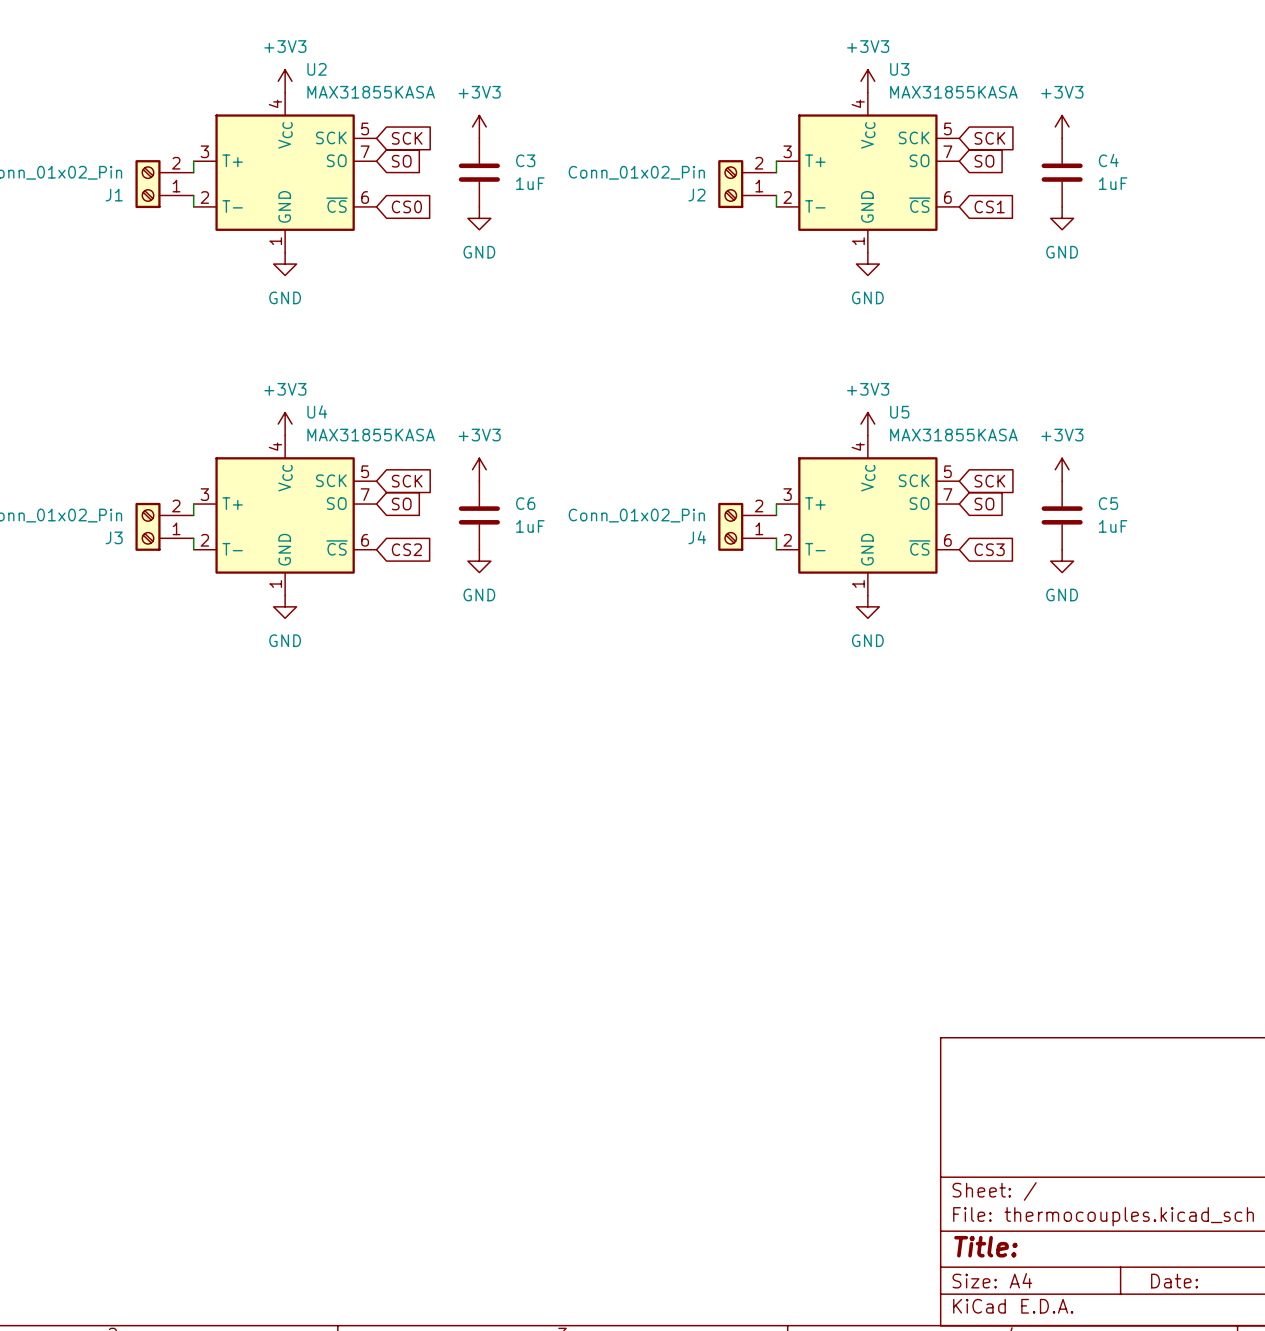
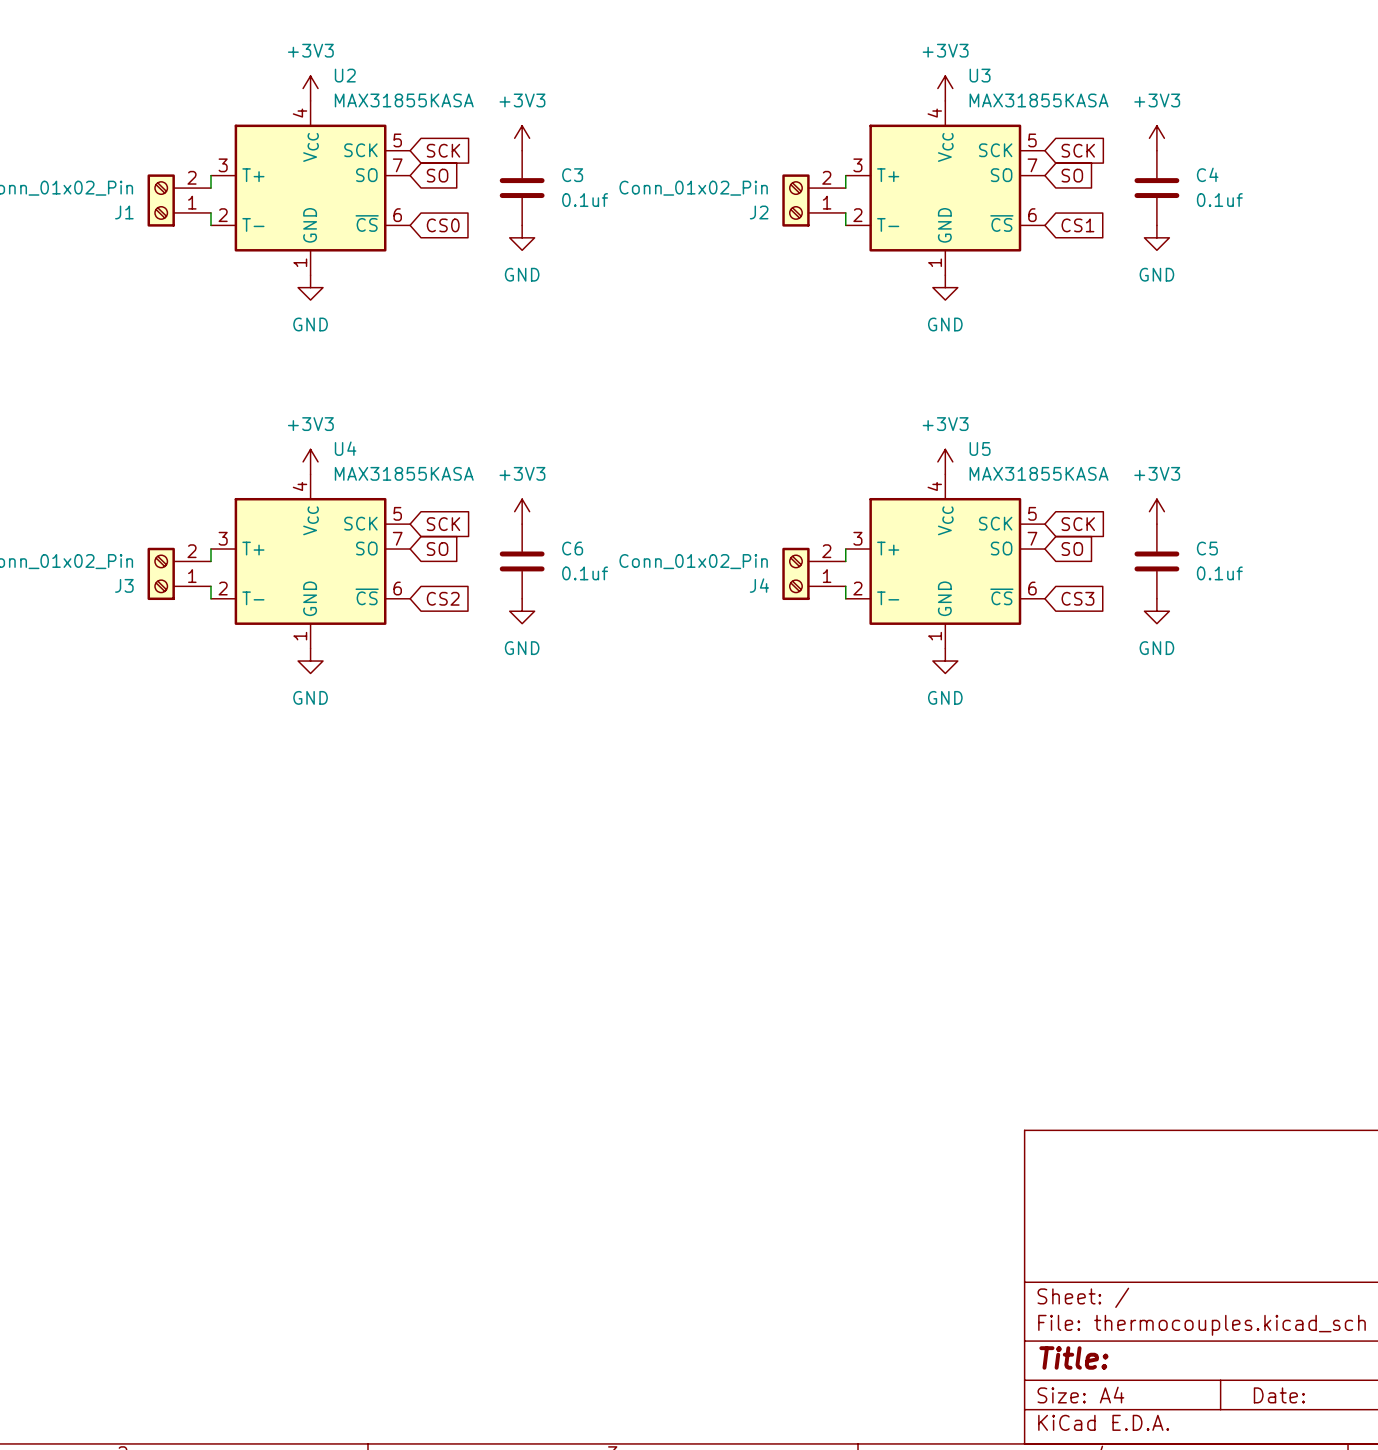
C3 value: 1uF (530, 183) -> 0.1uf (585, 200)
C4 value: 1uF (1113, 183) -> 0.1uf (1219, 200)
C6 value: 1uF (530, 526) -> 0.1uf (585, 573)
C5 value: 1uF (1113, 526) -> 0.1uf (1219, 573)

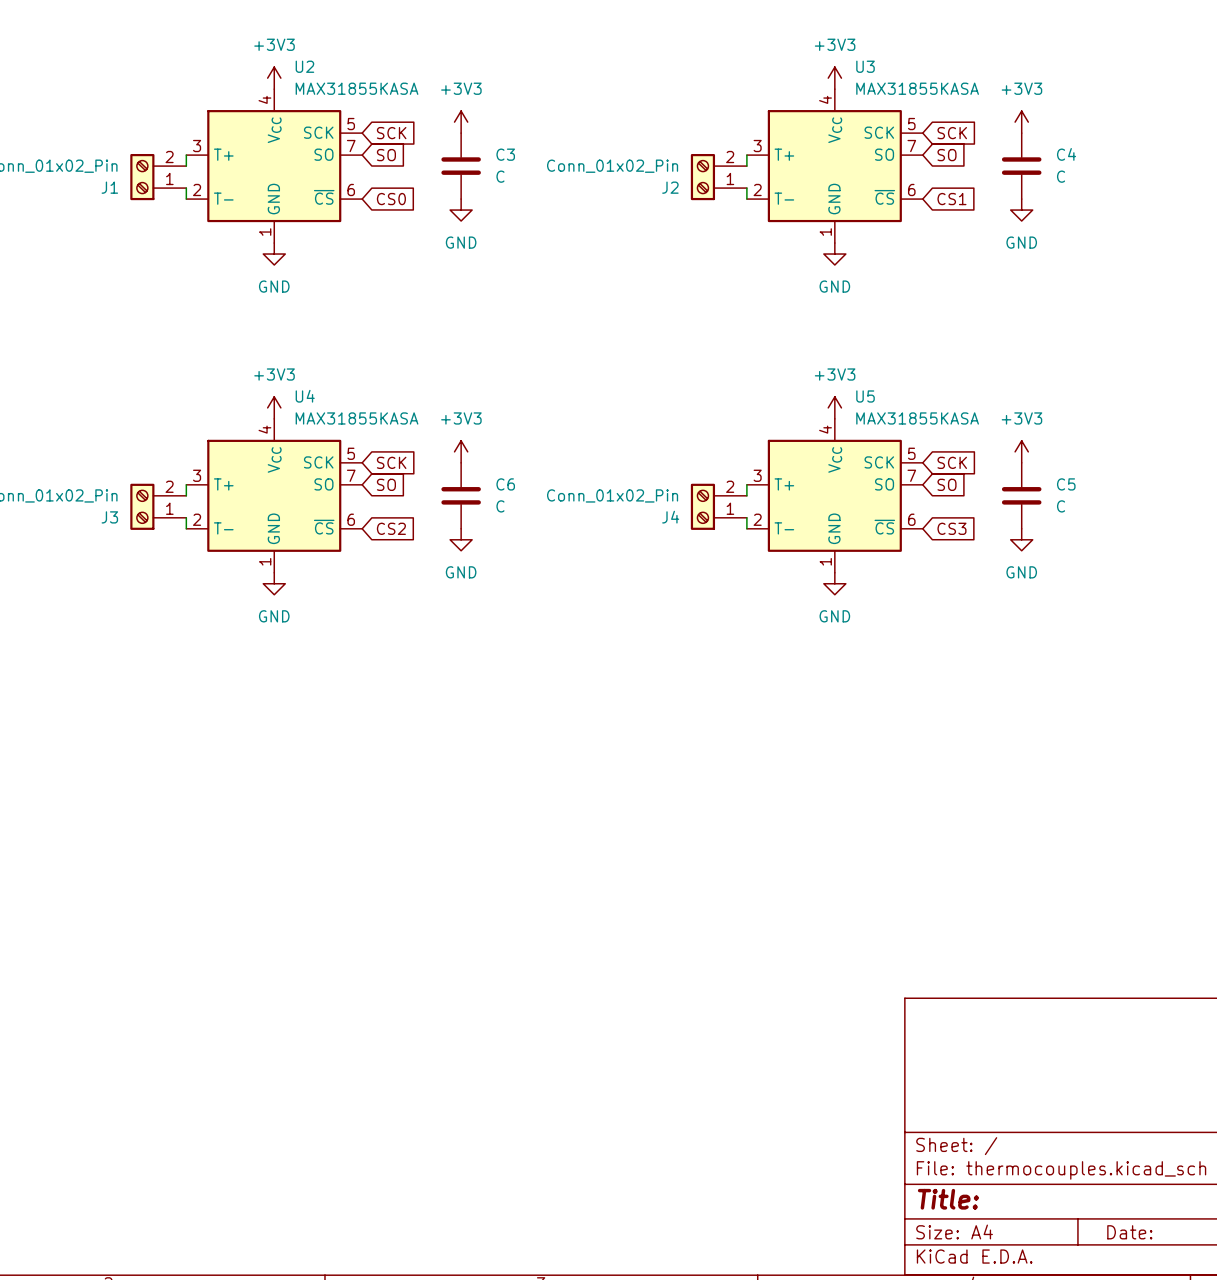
C3 value: 0.1uf (585, 200) -> C (500, 176)
C4 value: 0.1uf (1219, 200) -> C (1061, 176)
C6 value: 0.1uf (585, 573) -> C (500, 506)
C5 value: 0.1uf (1219, 573) -> C (1061, 506)

